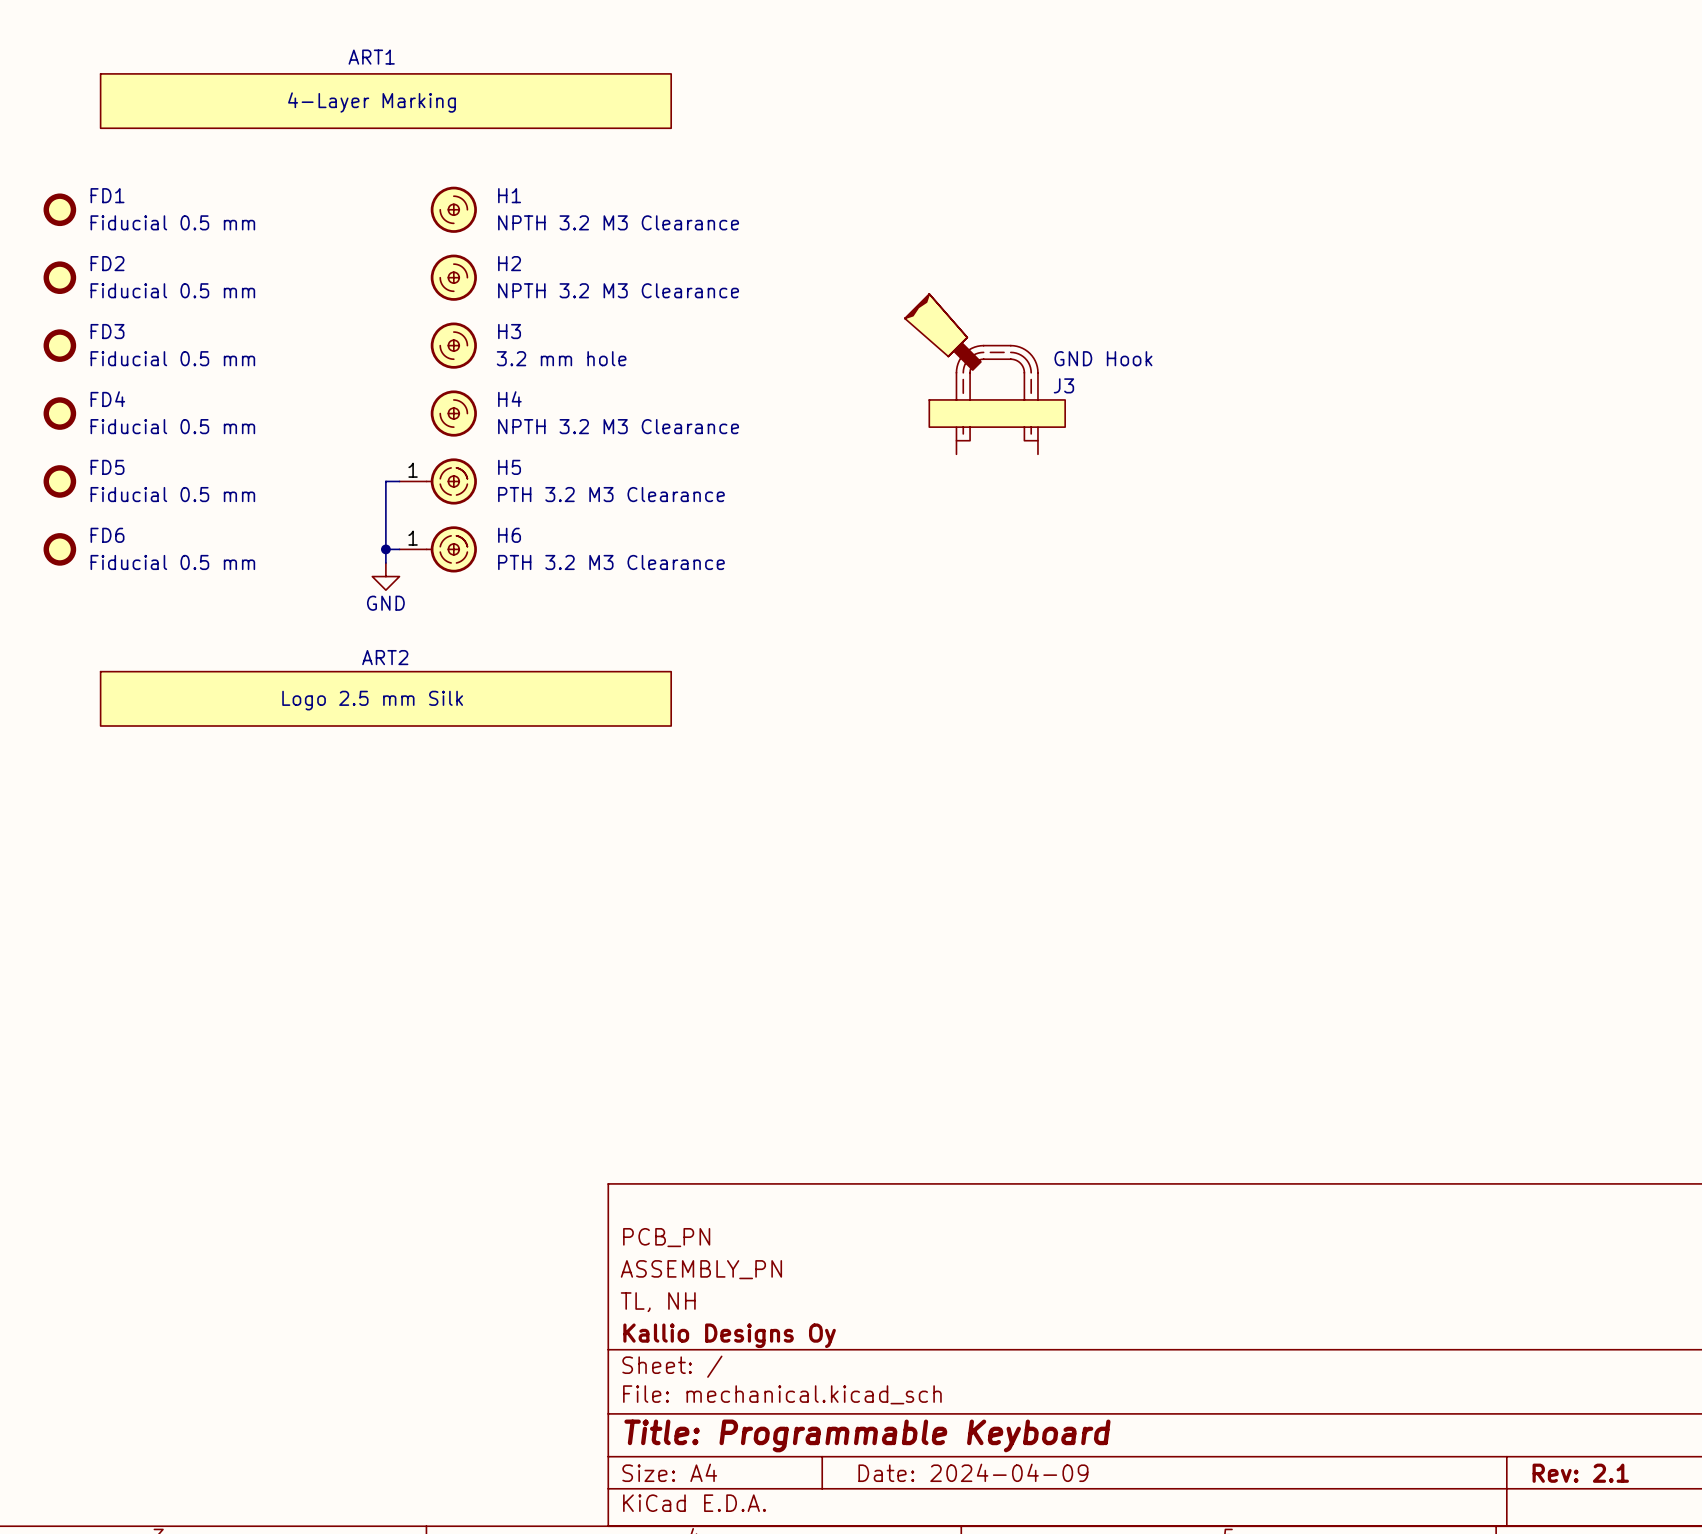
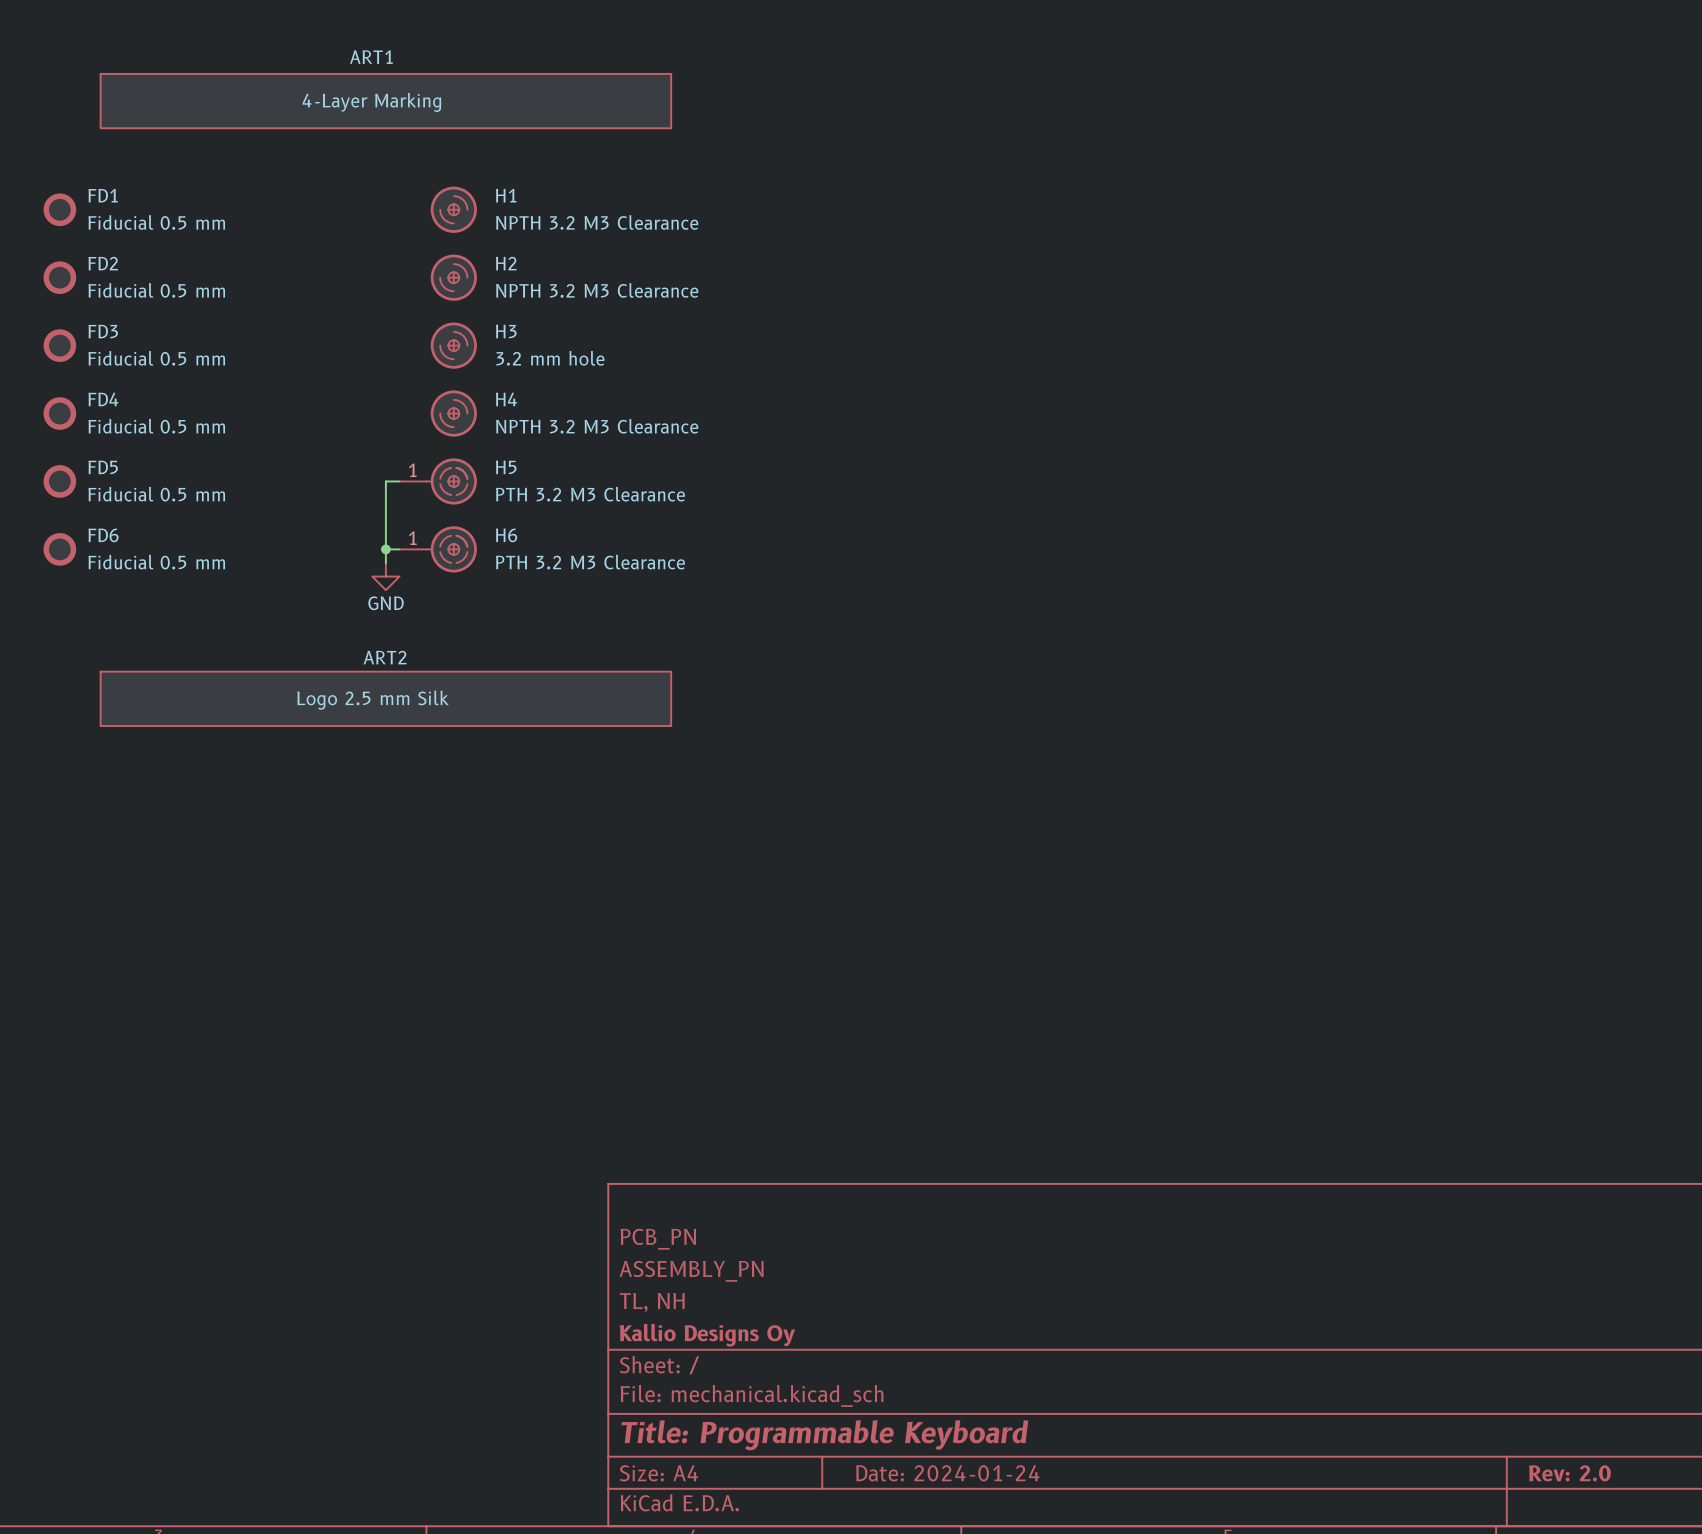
J3: GND Hook (985, 374) -> none
title block: Date: 2024-04-09 (973, 1472) -> Date: 2024-01-24 (947, 1473)
title block: Rev: 2.1 (1580, 1473) -> Rev: 2.0 (1569, 1473)

